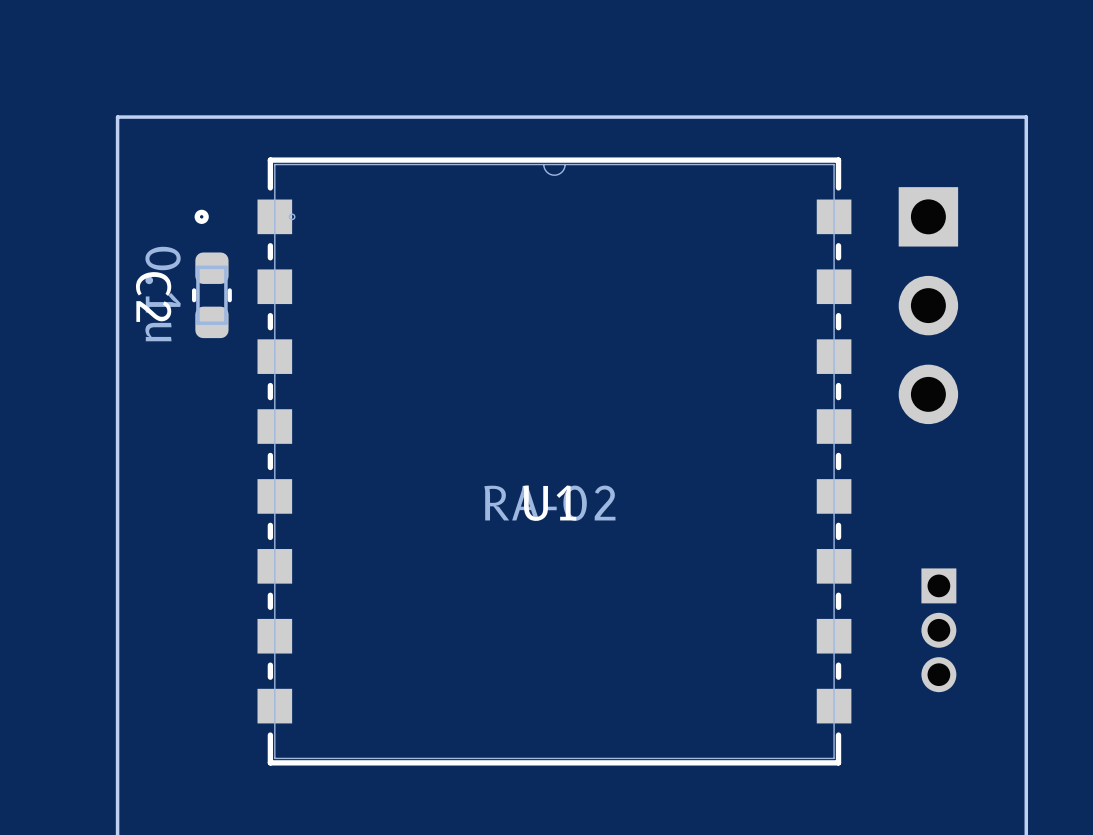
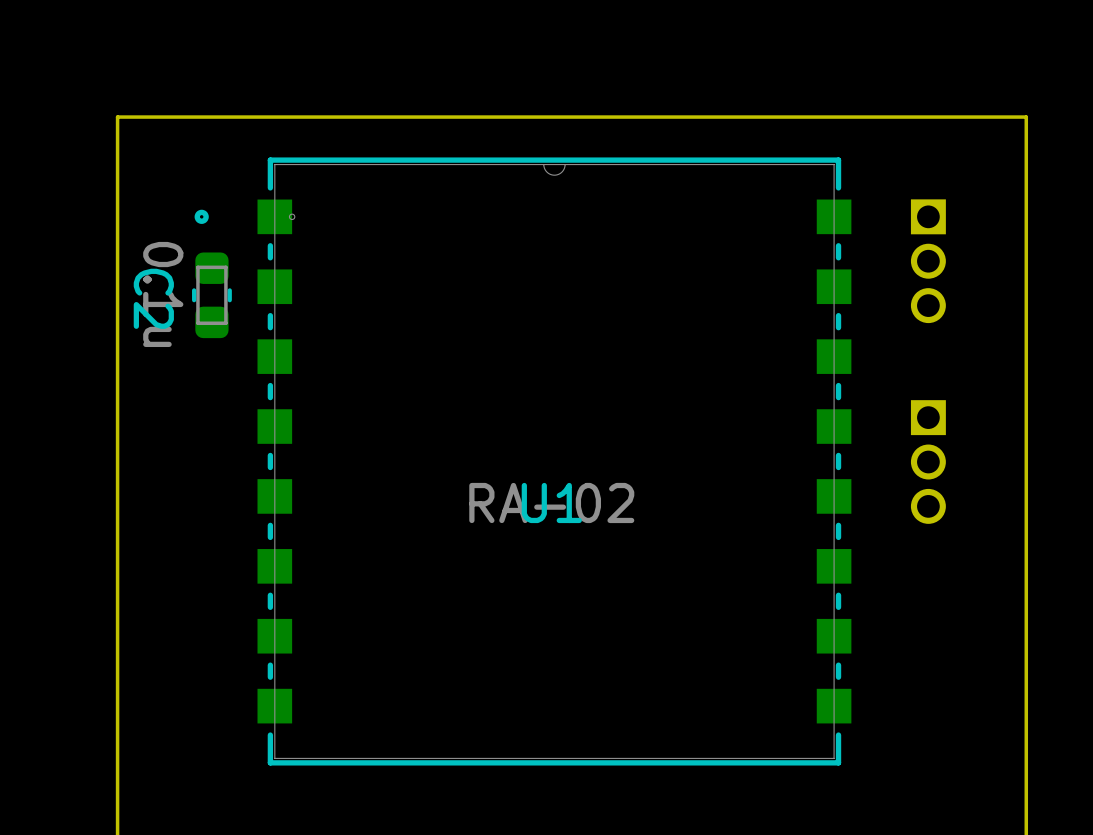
part: none -> (928, 261)
part: (928, 305) -> none
part position: (938, 630) -> (928, 462)

